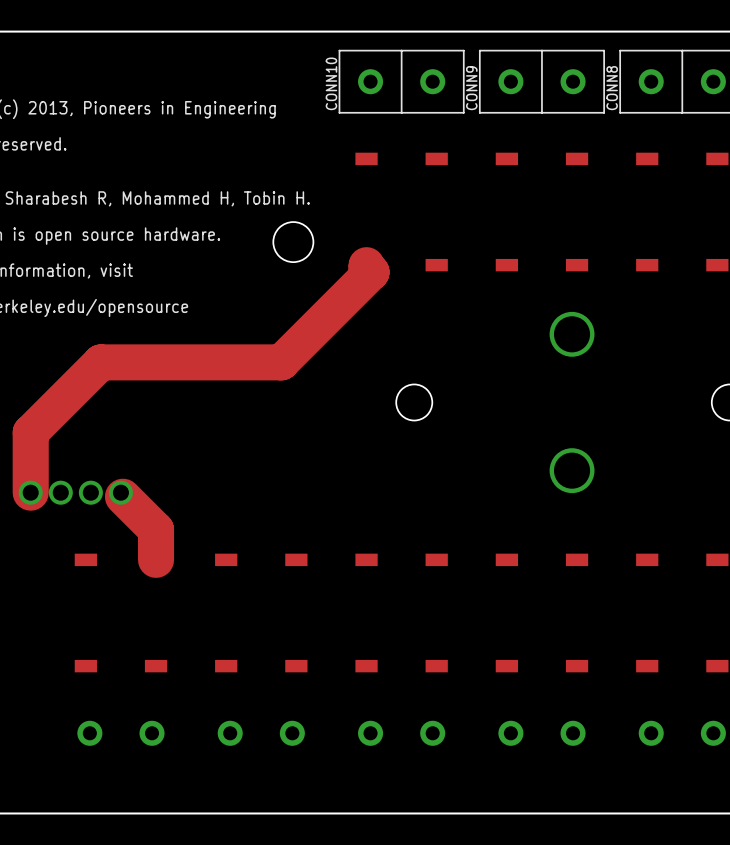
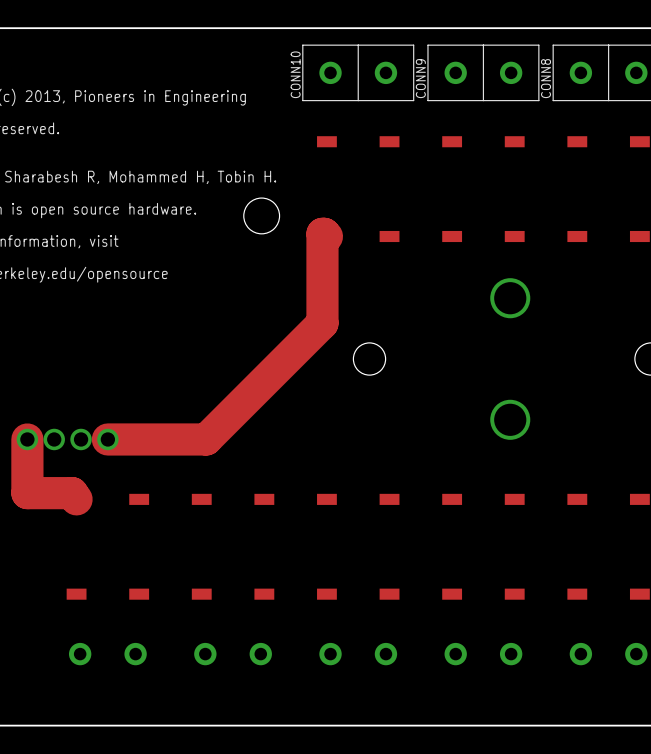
top track: (366, 265) (371, 272) (281, 362) (100, 362) (30, 432) (30, 492) -> (326, 236) (322, 233) (322, 323) (206, 439) (107, 439)
top track: none -> (27, 439) (27, 493) (72, 493) (76, 499)
top track: (122, 496) (156, 529) (156, 559) -> none

